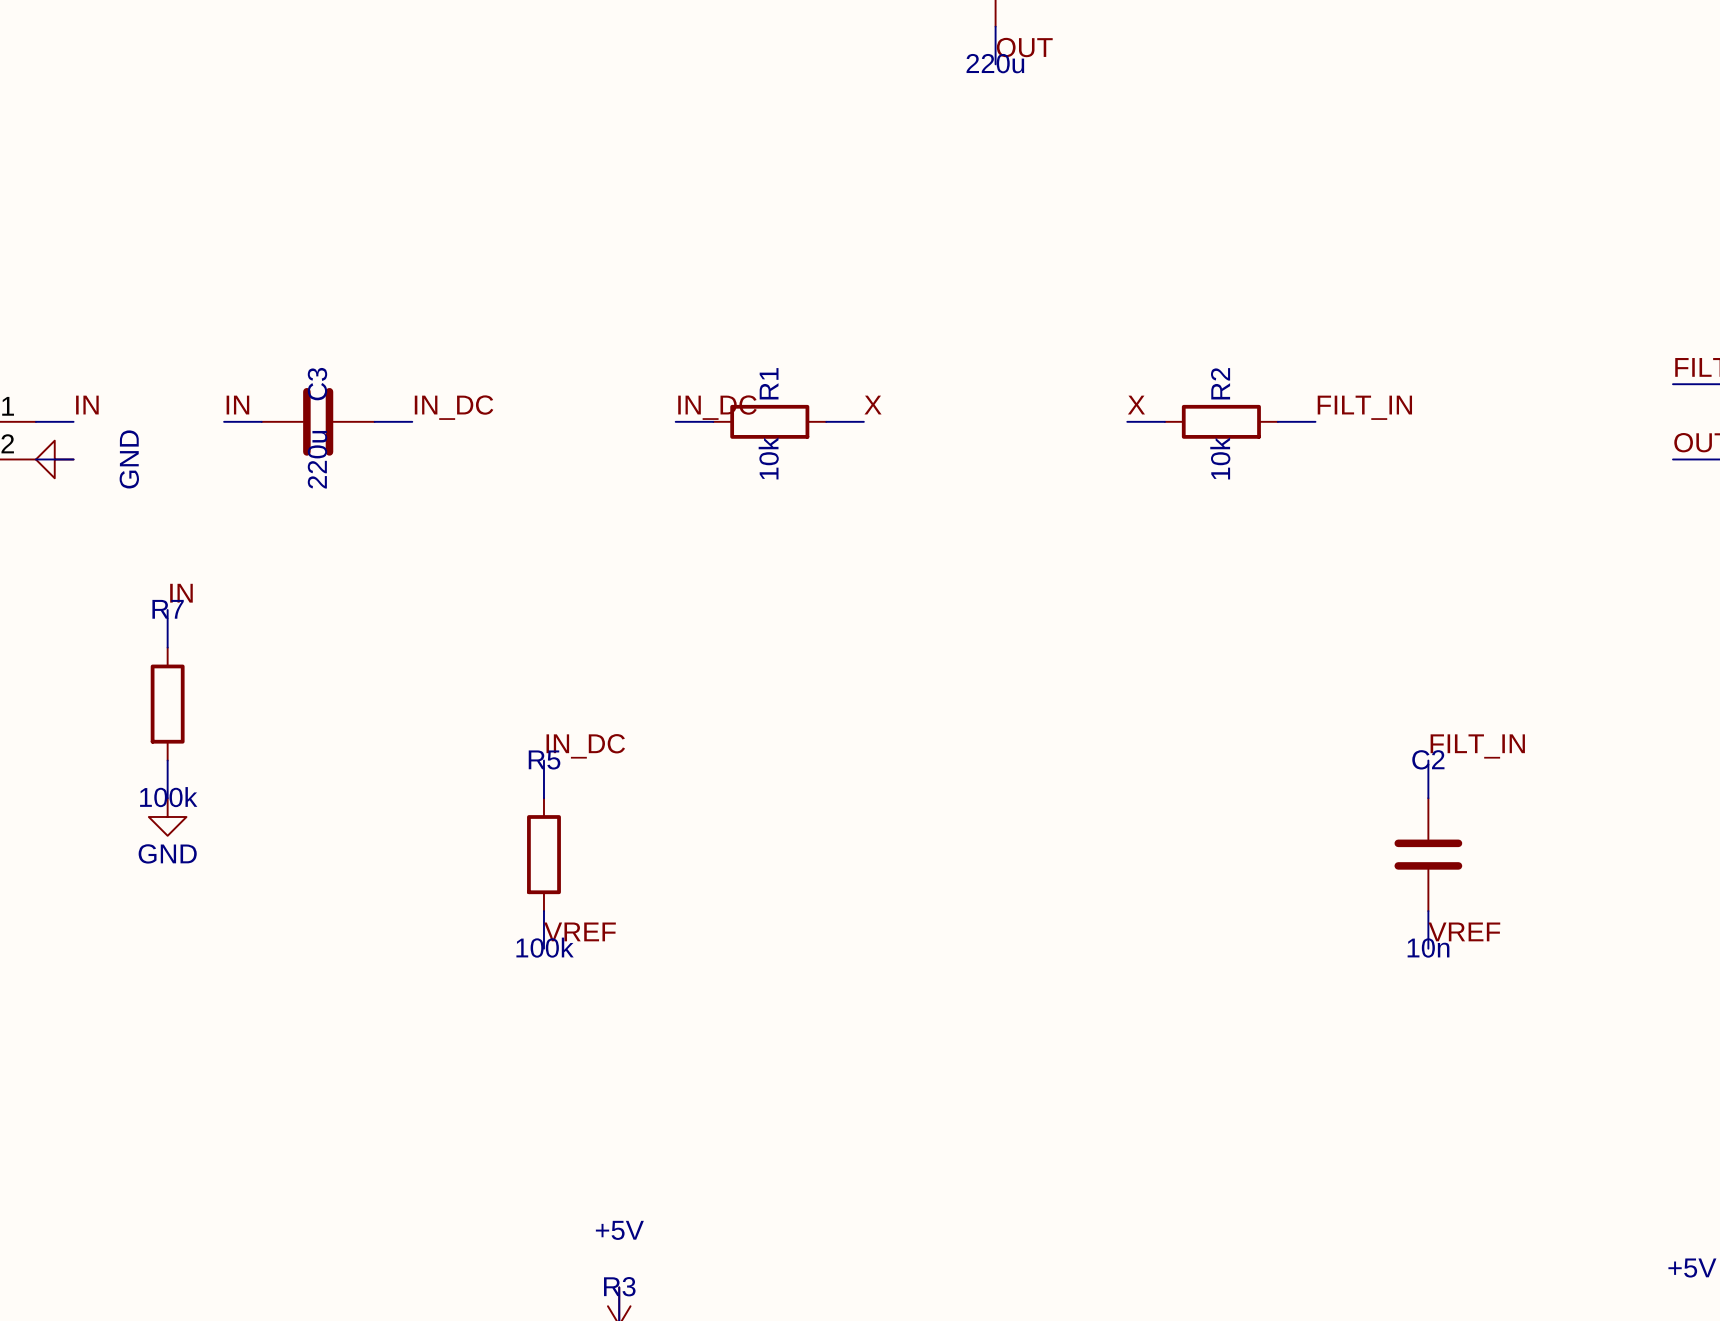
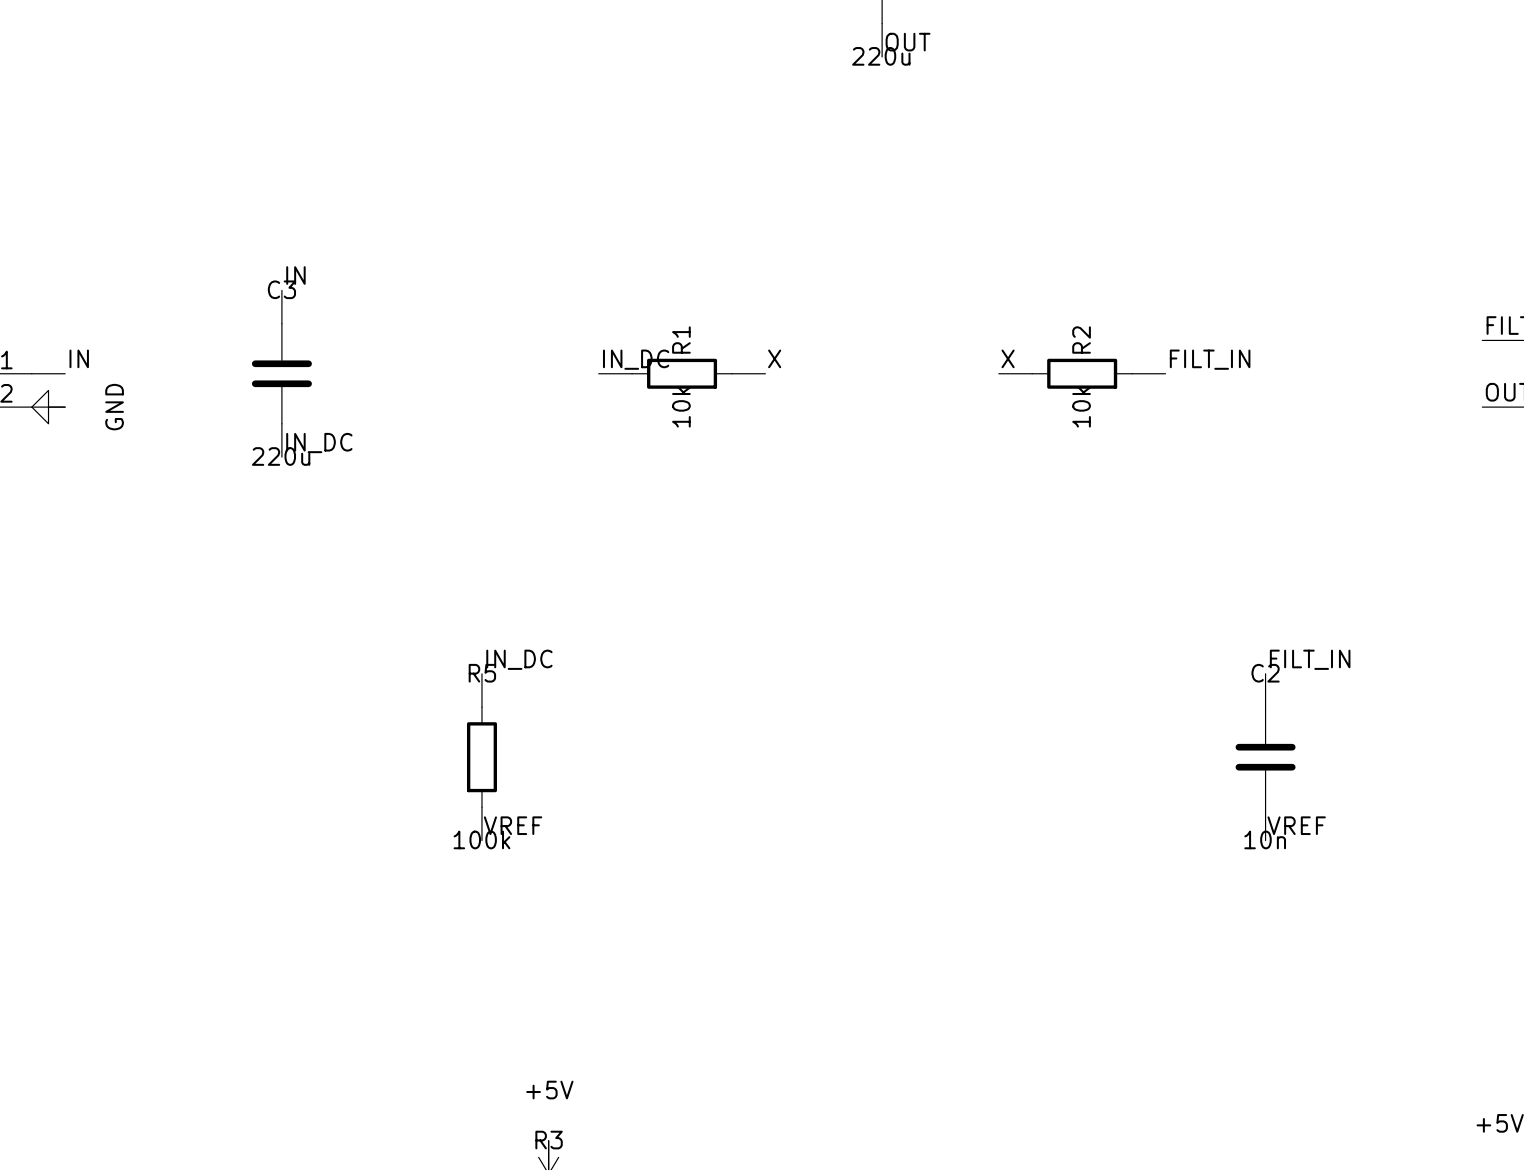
C3 name position: C3 (317, 384) -> C3 (281, 289)
label position: IN (237, 405) -> IN (295, 275)
label position: IN_DC (454, 407) -> IN_DC (319, 443)
wire: (224, 421) (261, 421) -> none
C3 rotation: 0° (318, 421) -> 90° clockwise (281, 373)
wire: (374, 421) (412, 421) -> none
C3 value position: 220u (317, 459) -> 220u (281, 456)
label: IN (181, 593) -> none
wire: (167, 610) (167, 647) -> (281, 290) (281, 323)
R7: 100k (167, 704) -> none
wire: (167, 760) (167, 798) -> (281, 423) (281, 457)
power symbol: GND (167, 816) -> none

